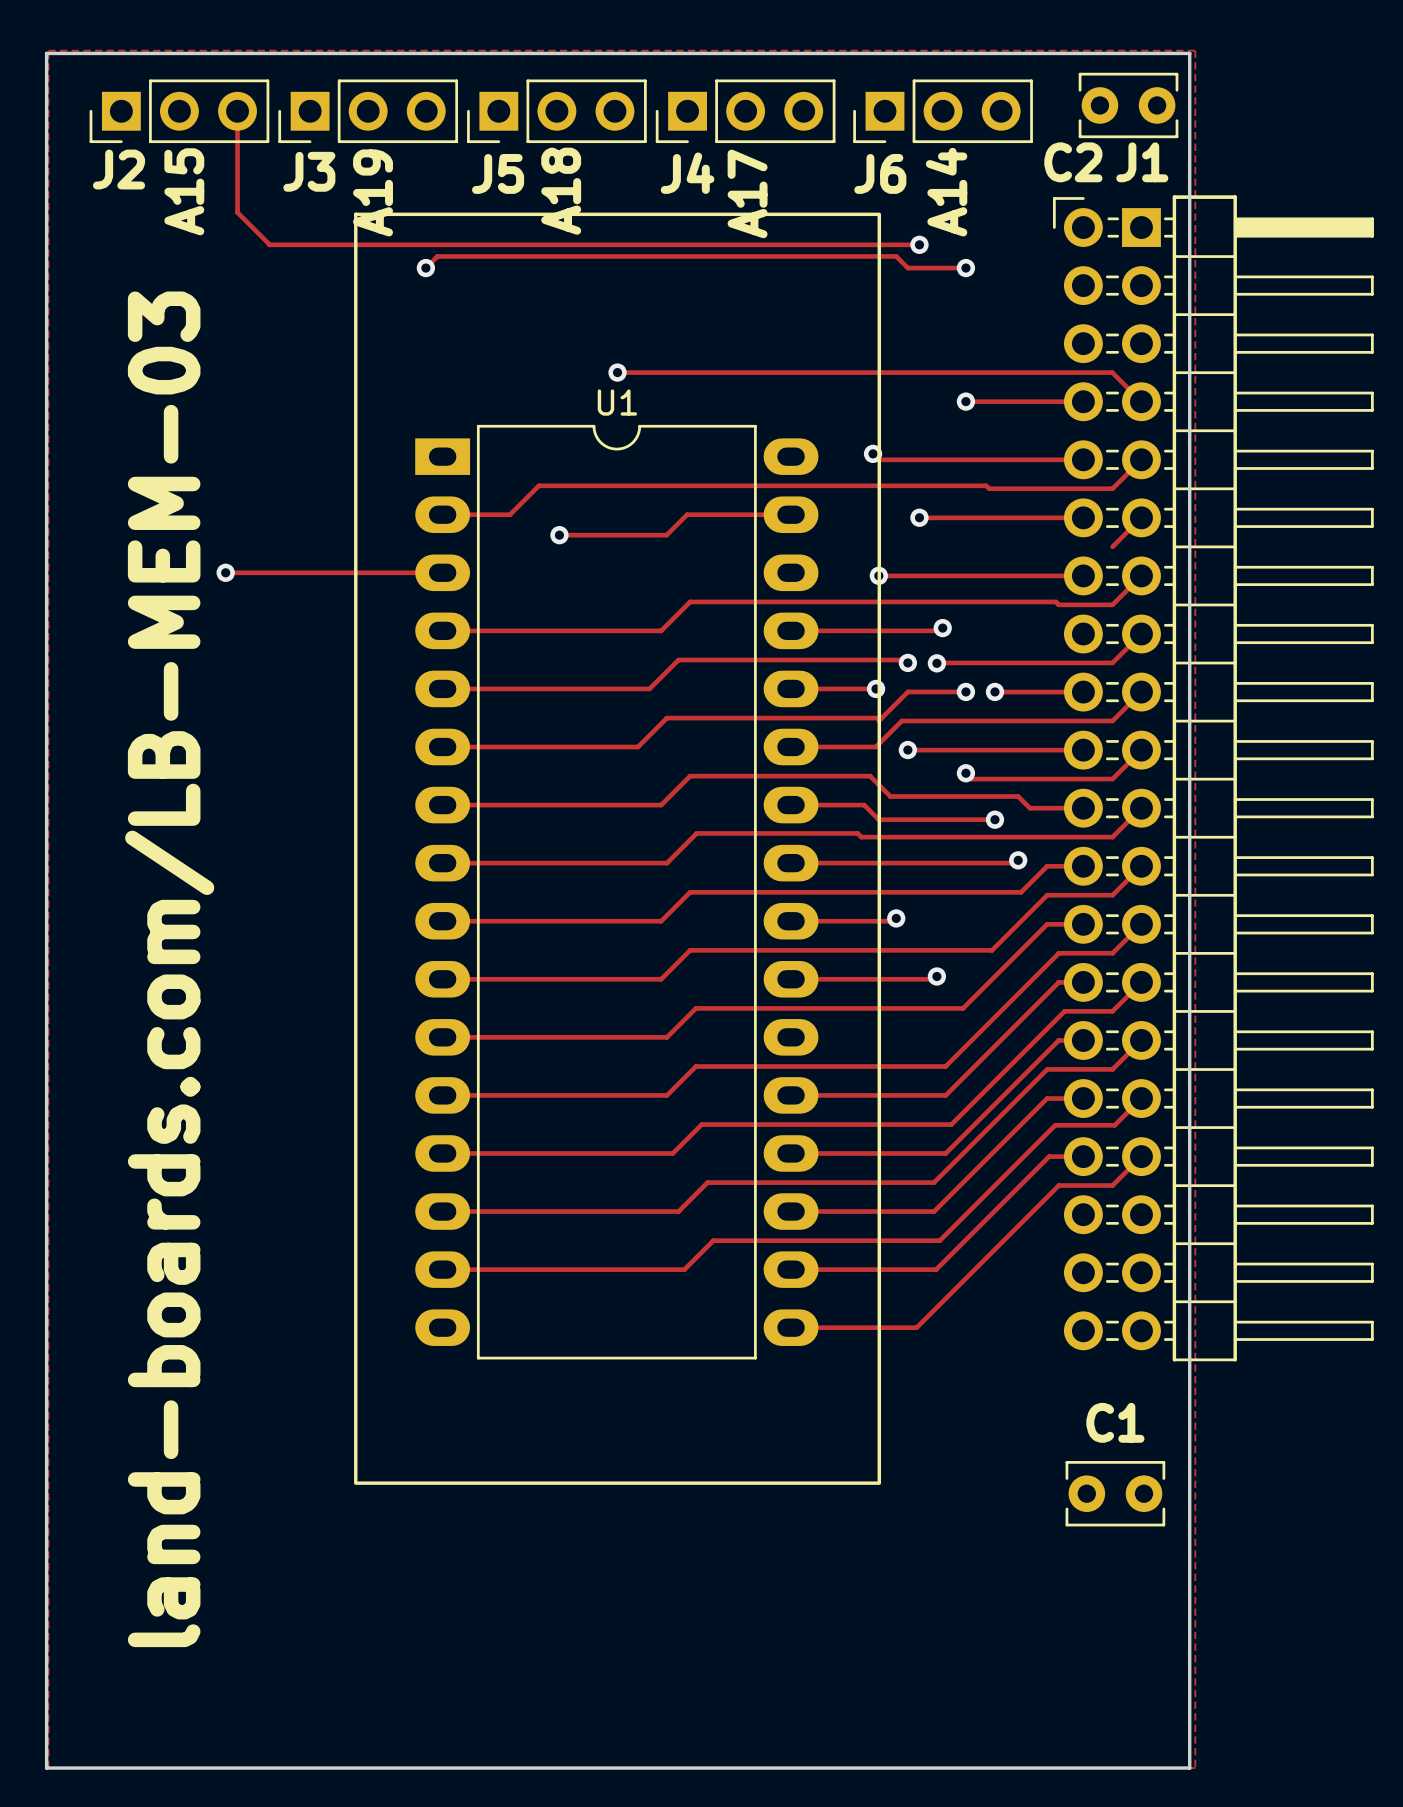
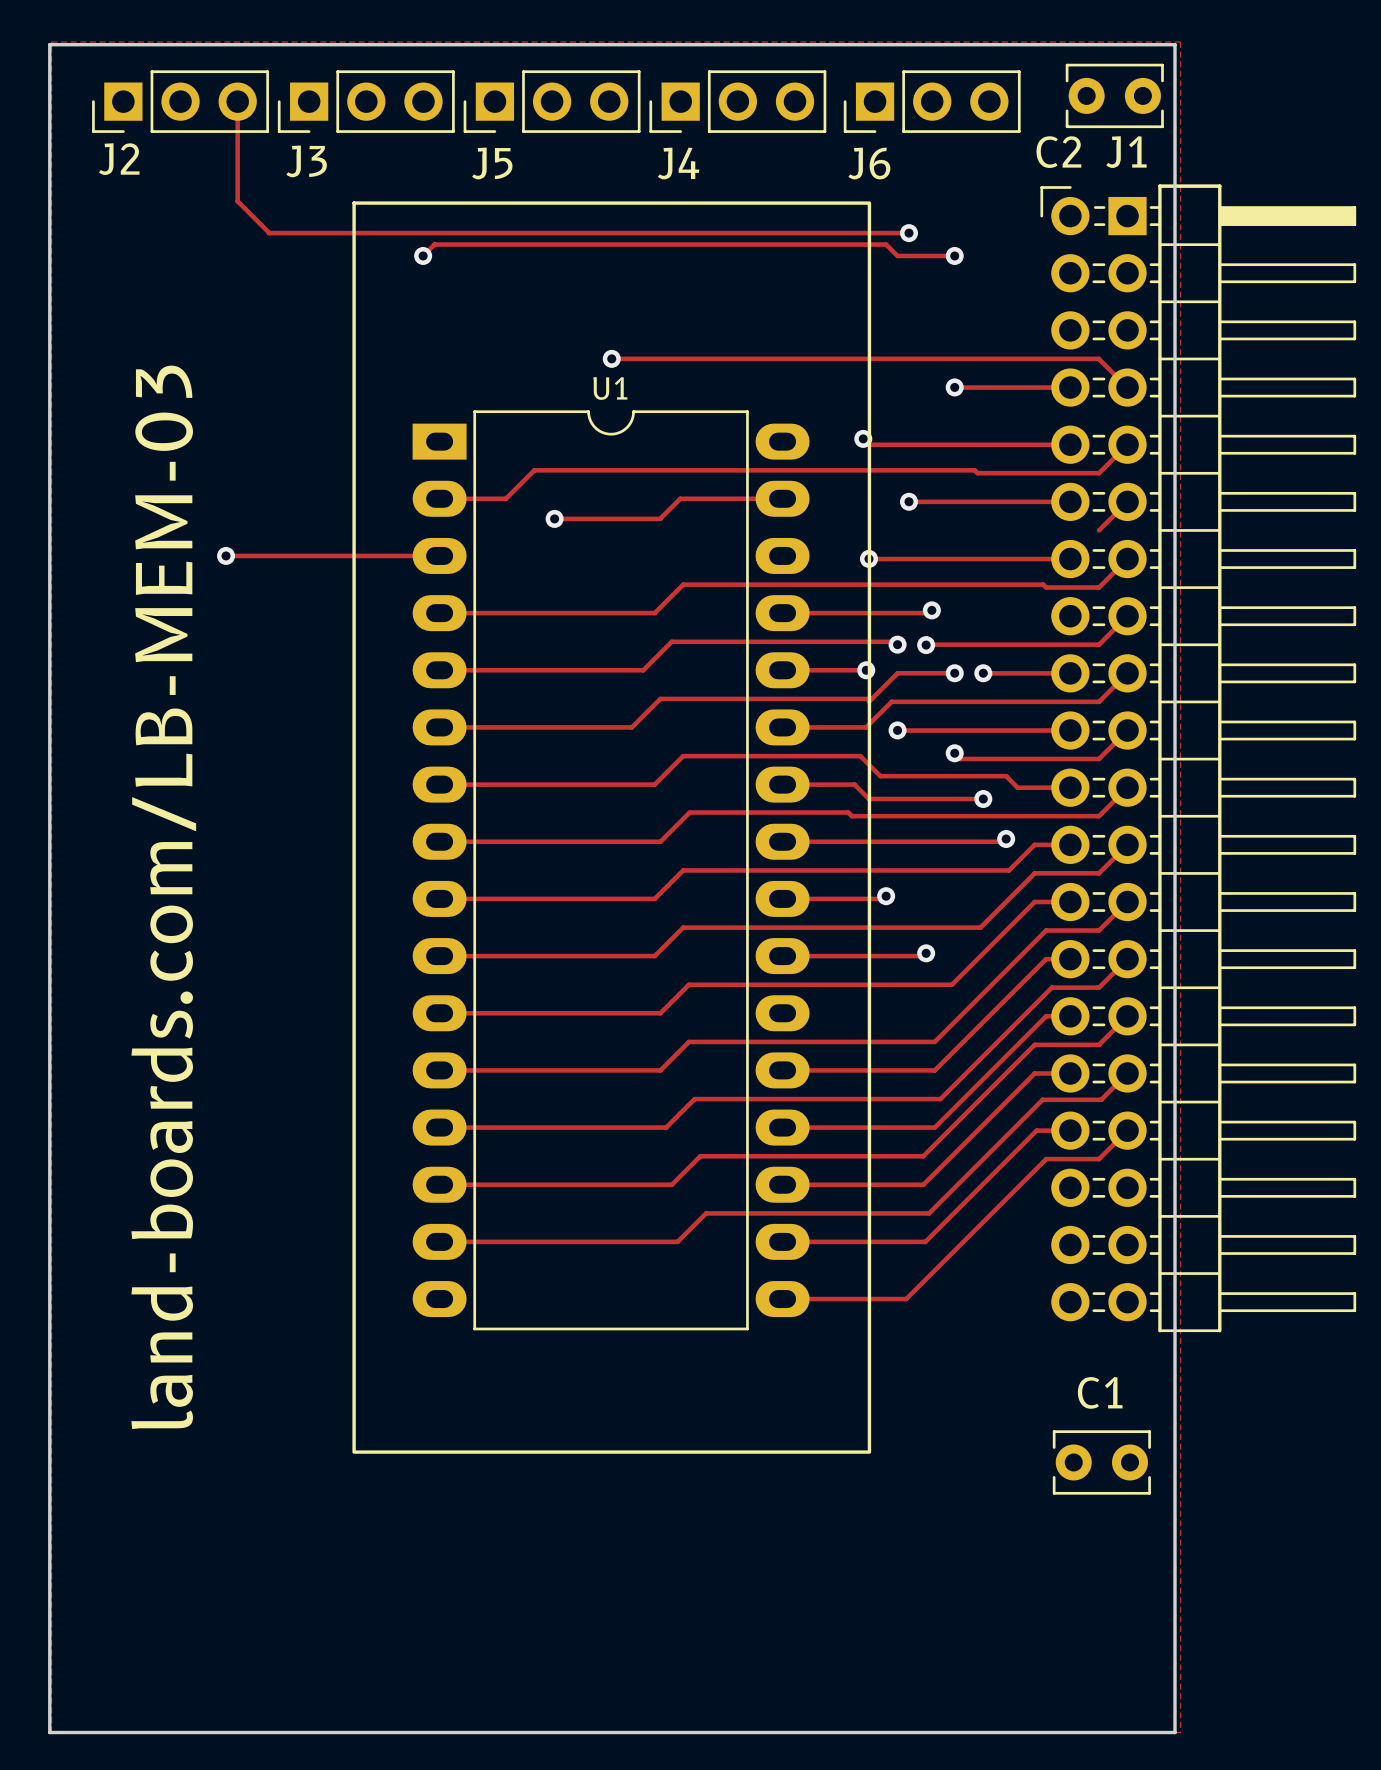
text: A15 (184, 191) -> none
text: A18 (561, 191) -> none
text: A19 (373, 192) -> none
text: A14 (946, 192) -> none
text: A17 (747, 193) -> none
text position: land-boards.com/LB-MEM-03 (169, 969) -> land-boards.com/LB-MEM-03 (163, 897)

